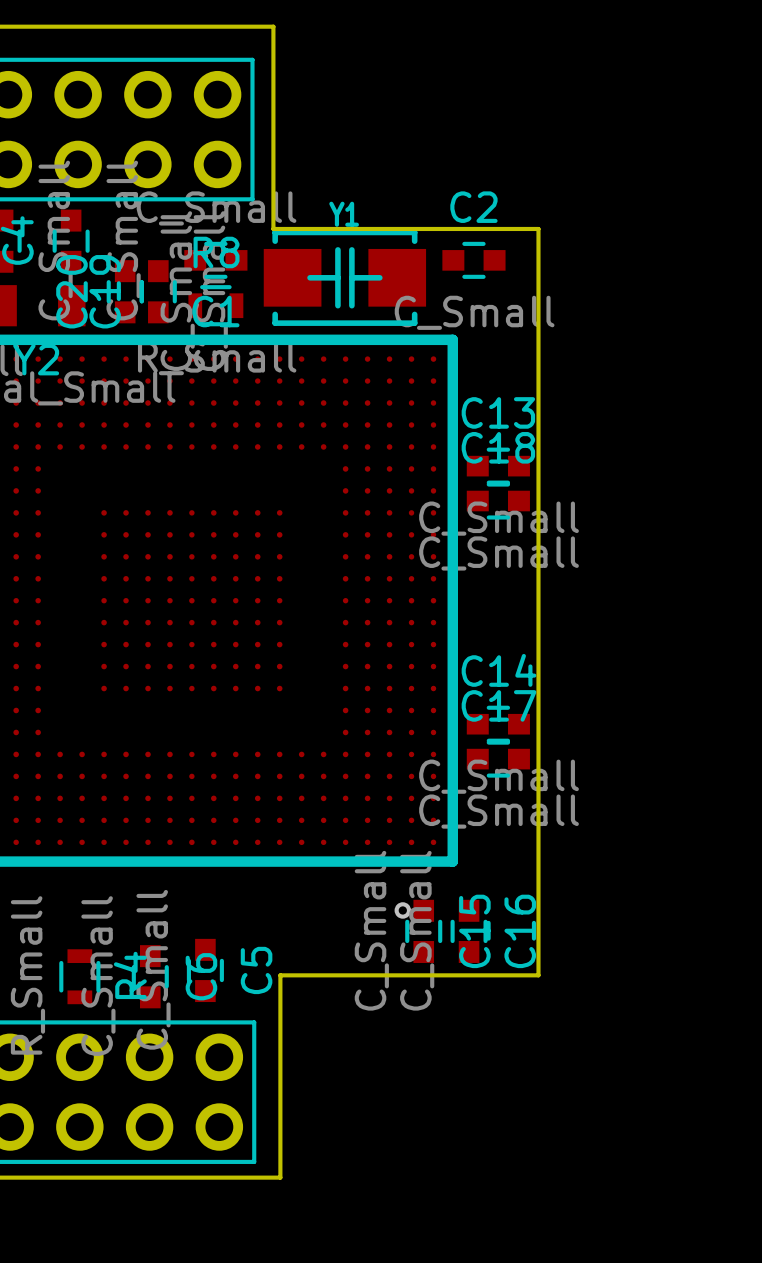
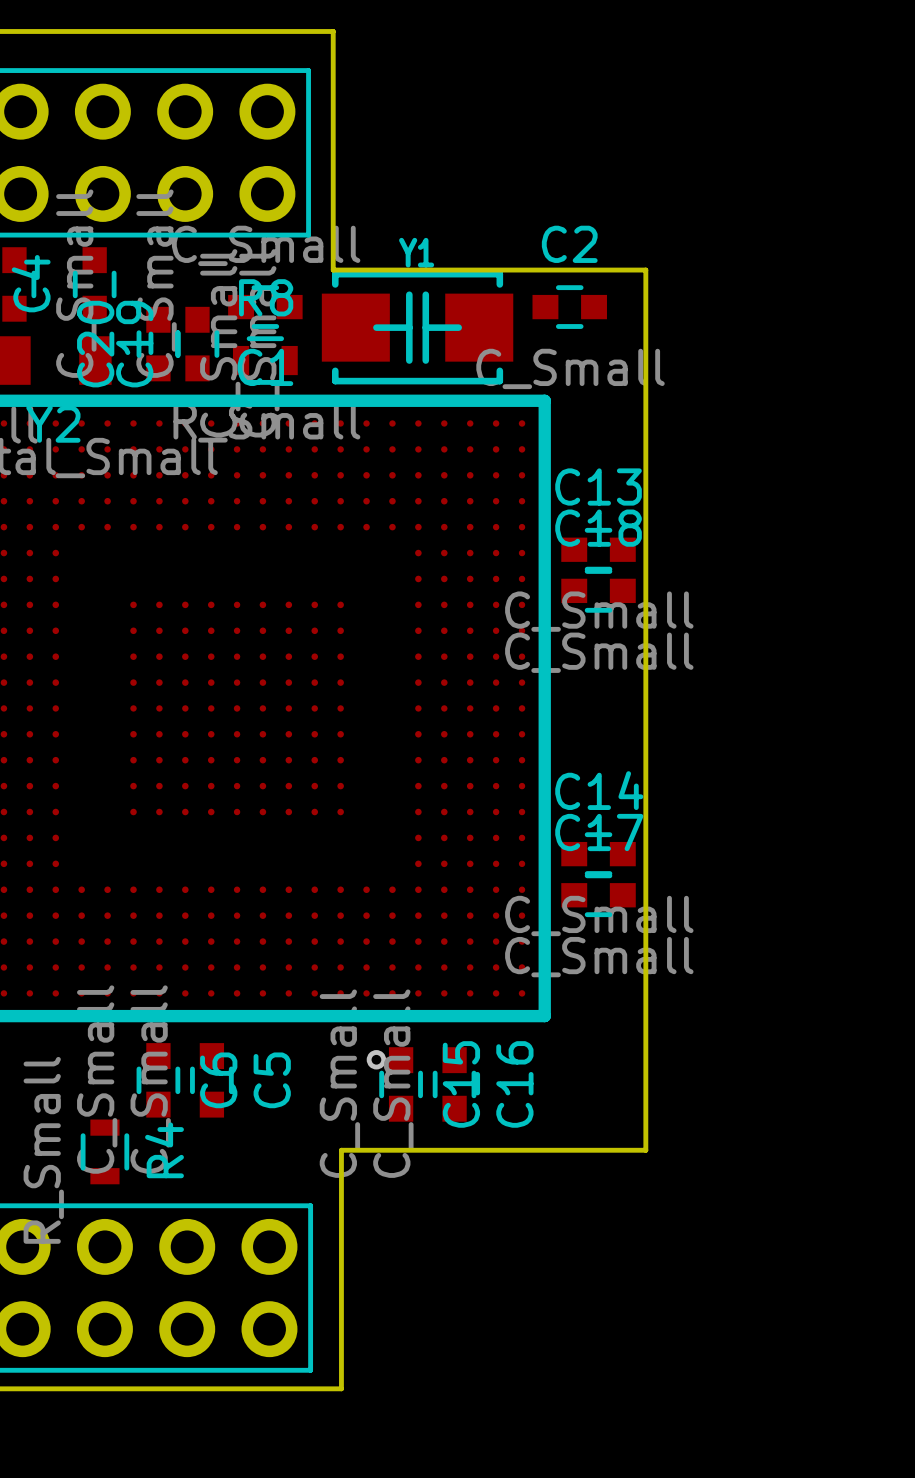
via position: (402, 910) -> (376, 1059)
C15 position: (423, 931) -> (401, 1084)
C16 position: (469, 931) -> (454, 1084)
C5 position: (205, 970) -> (211, 1080)
C6 position: (150, 976) -> (158, 1080)

